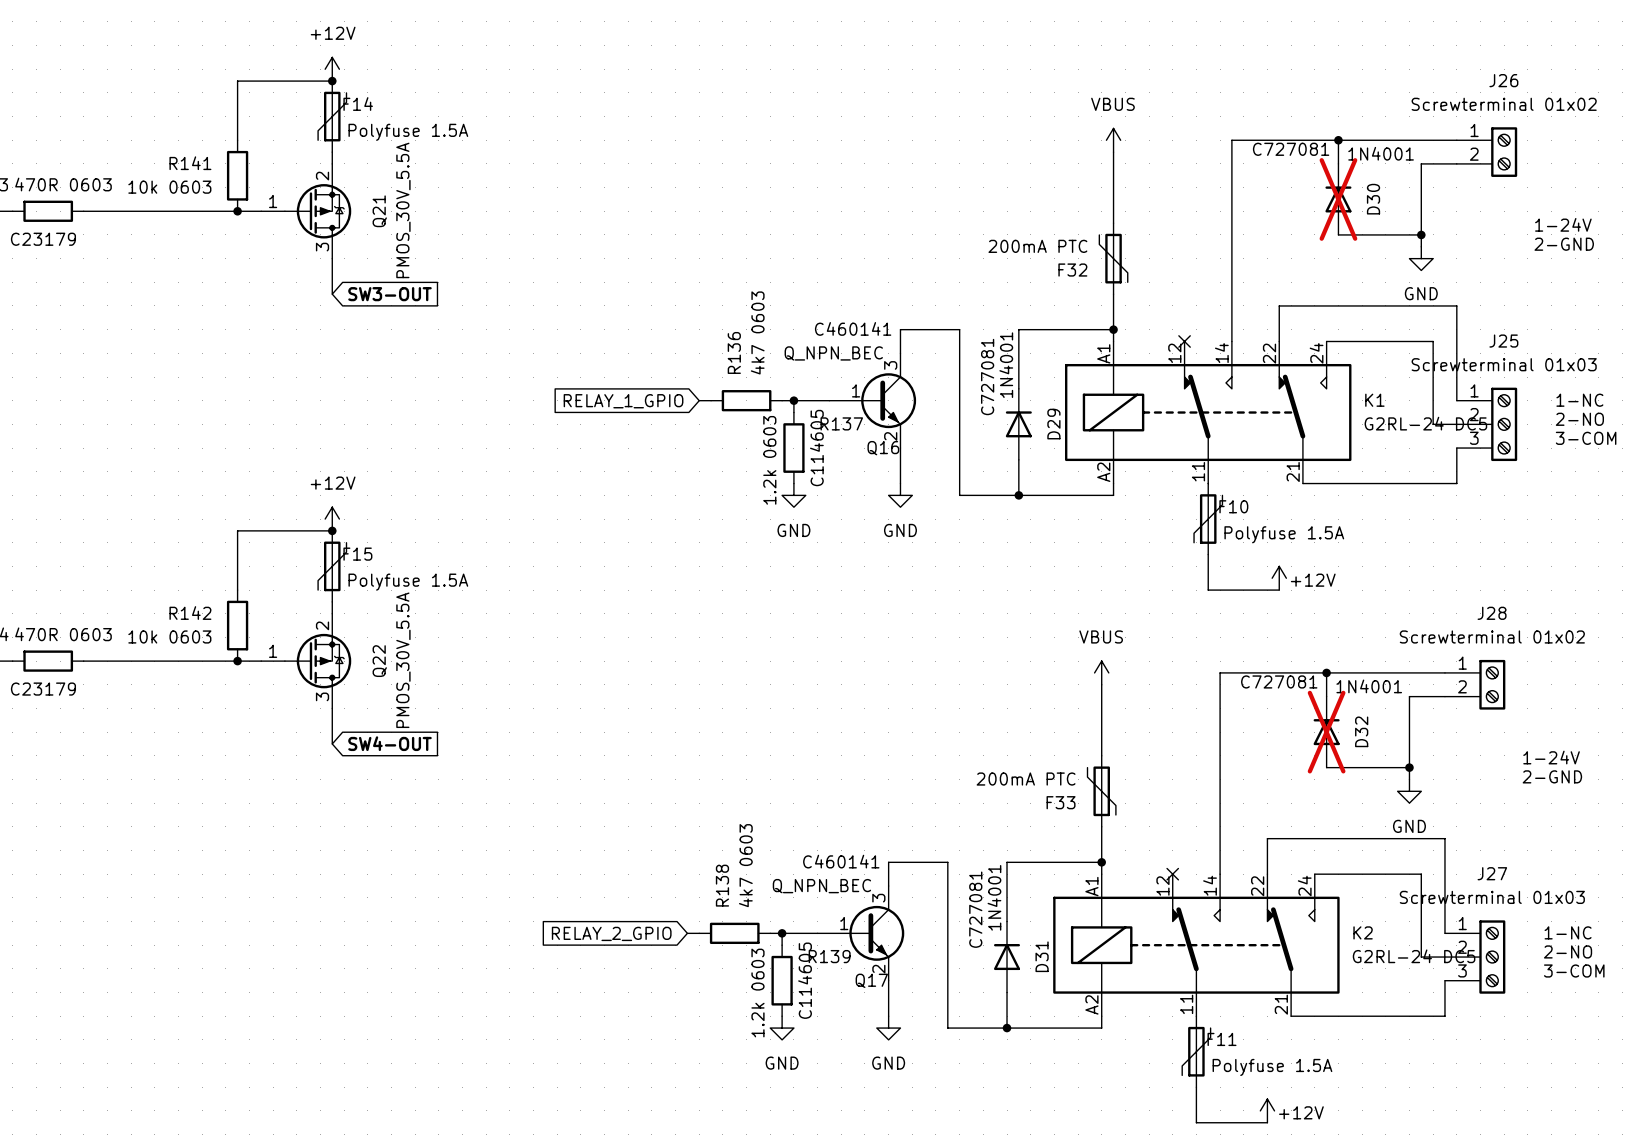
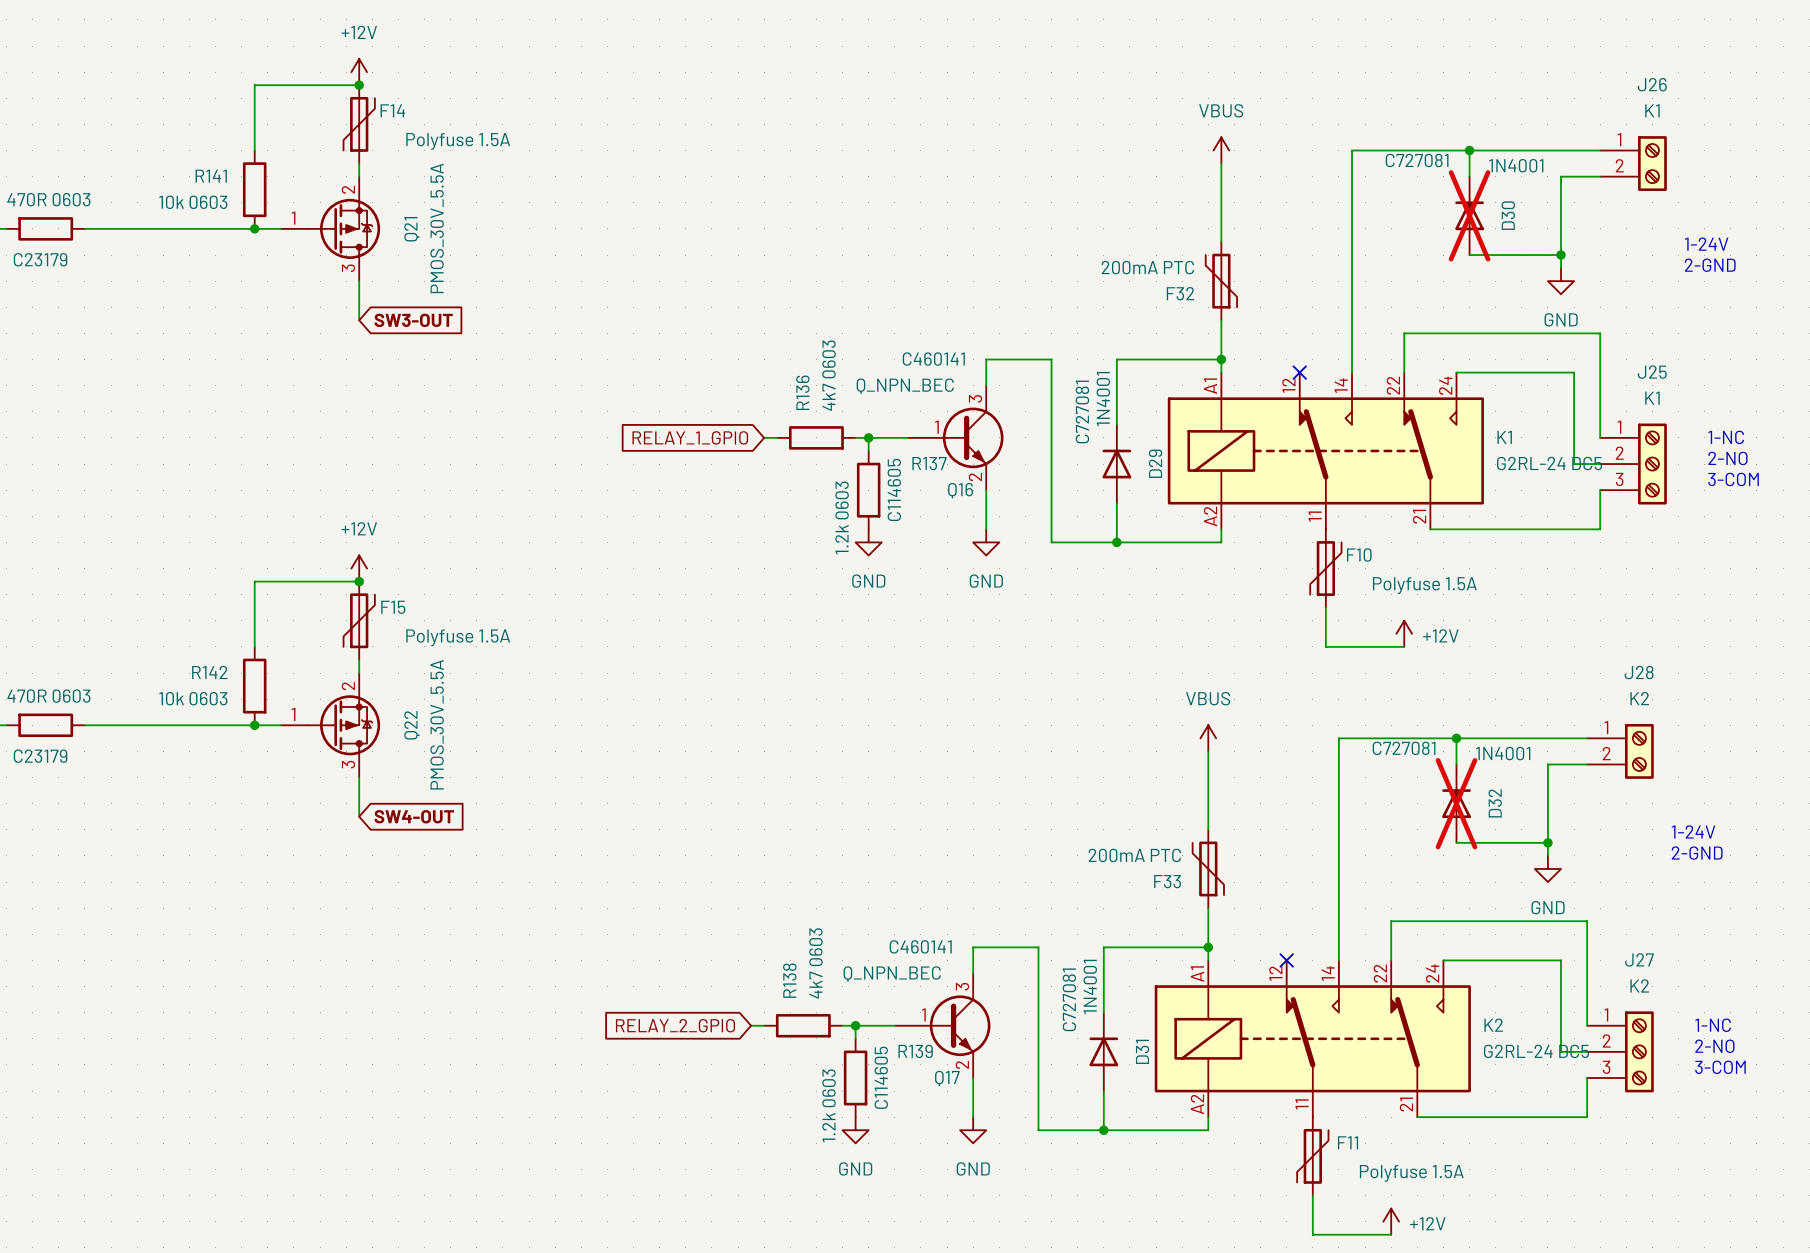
J26 value: Screwterminal 01x02 (1504, 104) -> K1 (1652, 110)
J25 value: Screwterminal 01x03 (1504, 364) -> K1 (1652, 398)
J28 value: Screwterminal 01x02 (1492, 636) -> K2 (1639, 698)
J27 value: Screwterminal 01x03 (1492, 897) -> K2 (1639, 985)

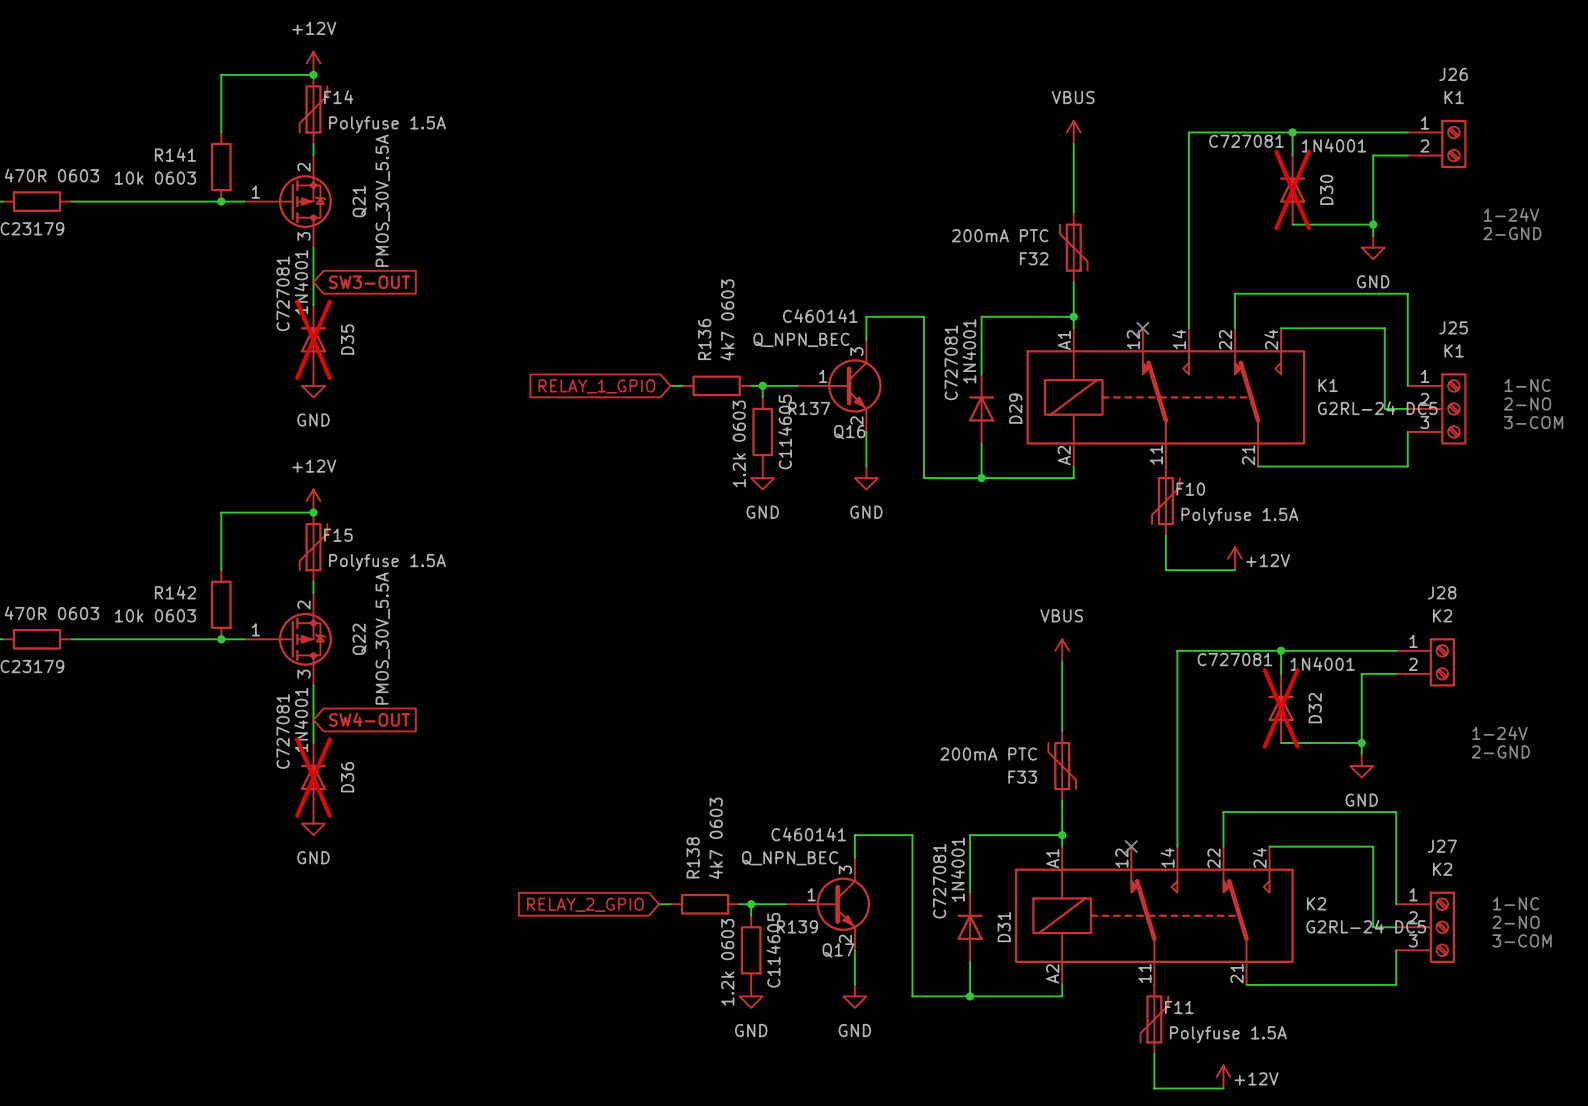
wire: none -> (313, 282) (313, 305)
D35: none -> 1N4001 (313, 339)
power symbol: none -> GND (313, 385)
wire: none -> (313, 719) (313, 742)
D36: none -> 1N4001 (313, 777)
power symbol: none -> GND (313, 823)

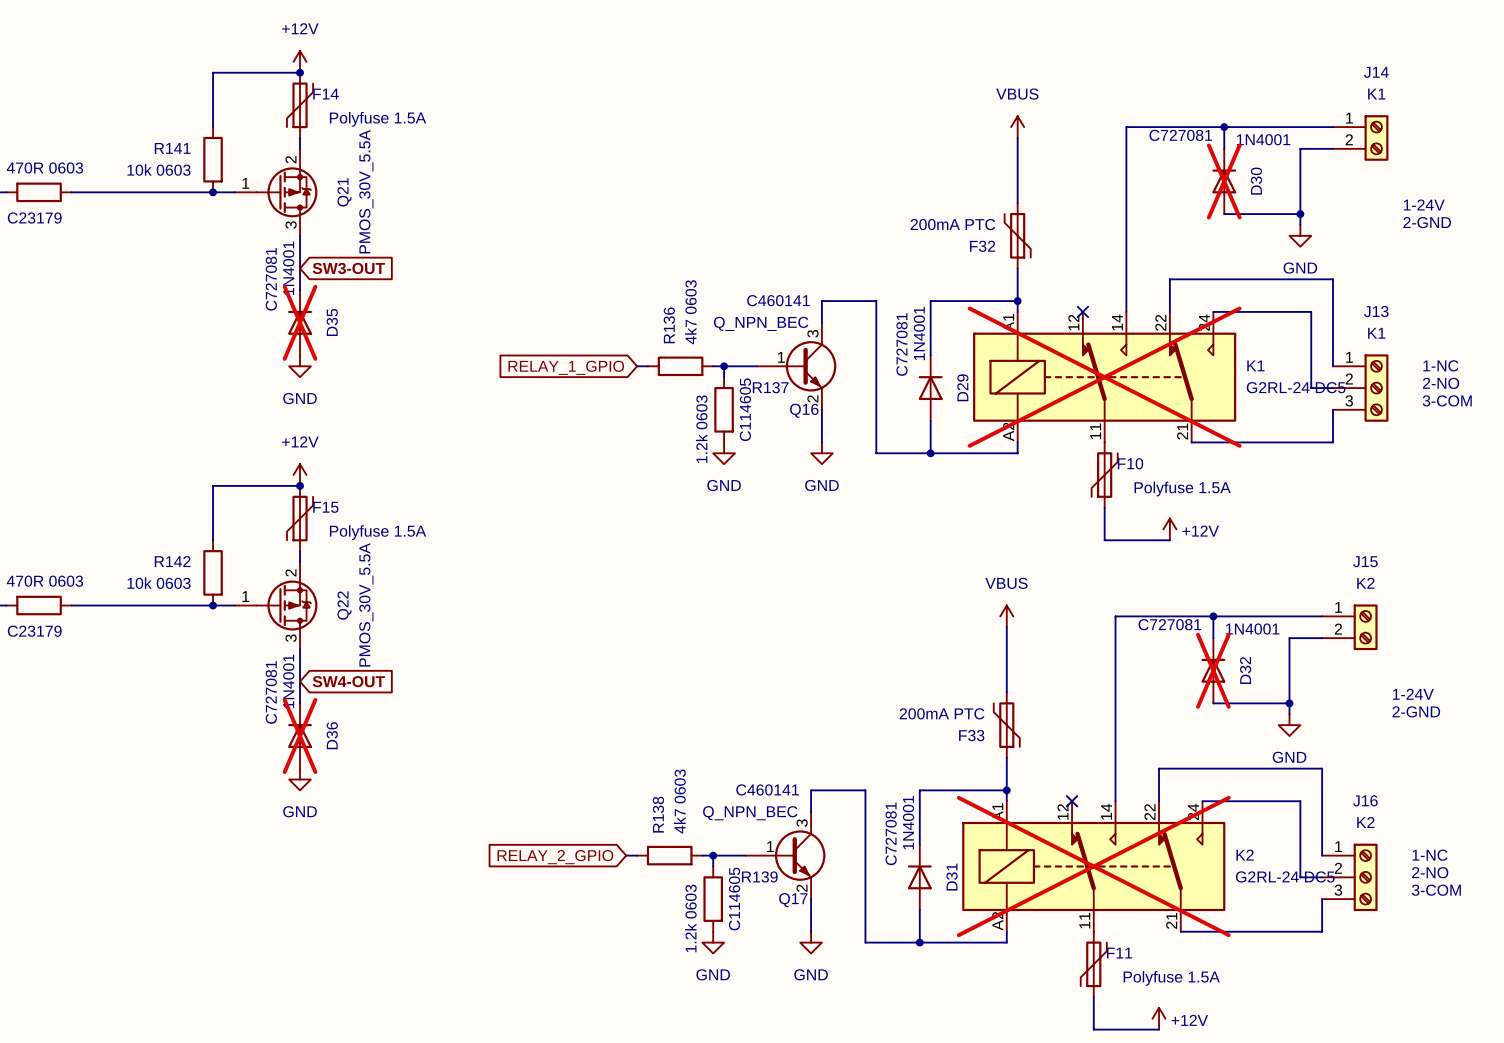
J26 name: J26 (1453, 74) -> J14 (1376, 72)
J25 name: J25 (1453, 327) -> J13 (1376, 311)
K1 do-not-place cross: none -> (1104, 377)
J28 name: J28 (1442, 592) -> J15 (1365, 561)
J27 name: J27 (1442, 846) -> J16 (1365, 800)
K2 do-not-place cross: none -> (1093, 866)

